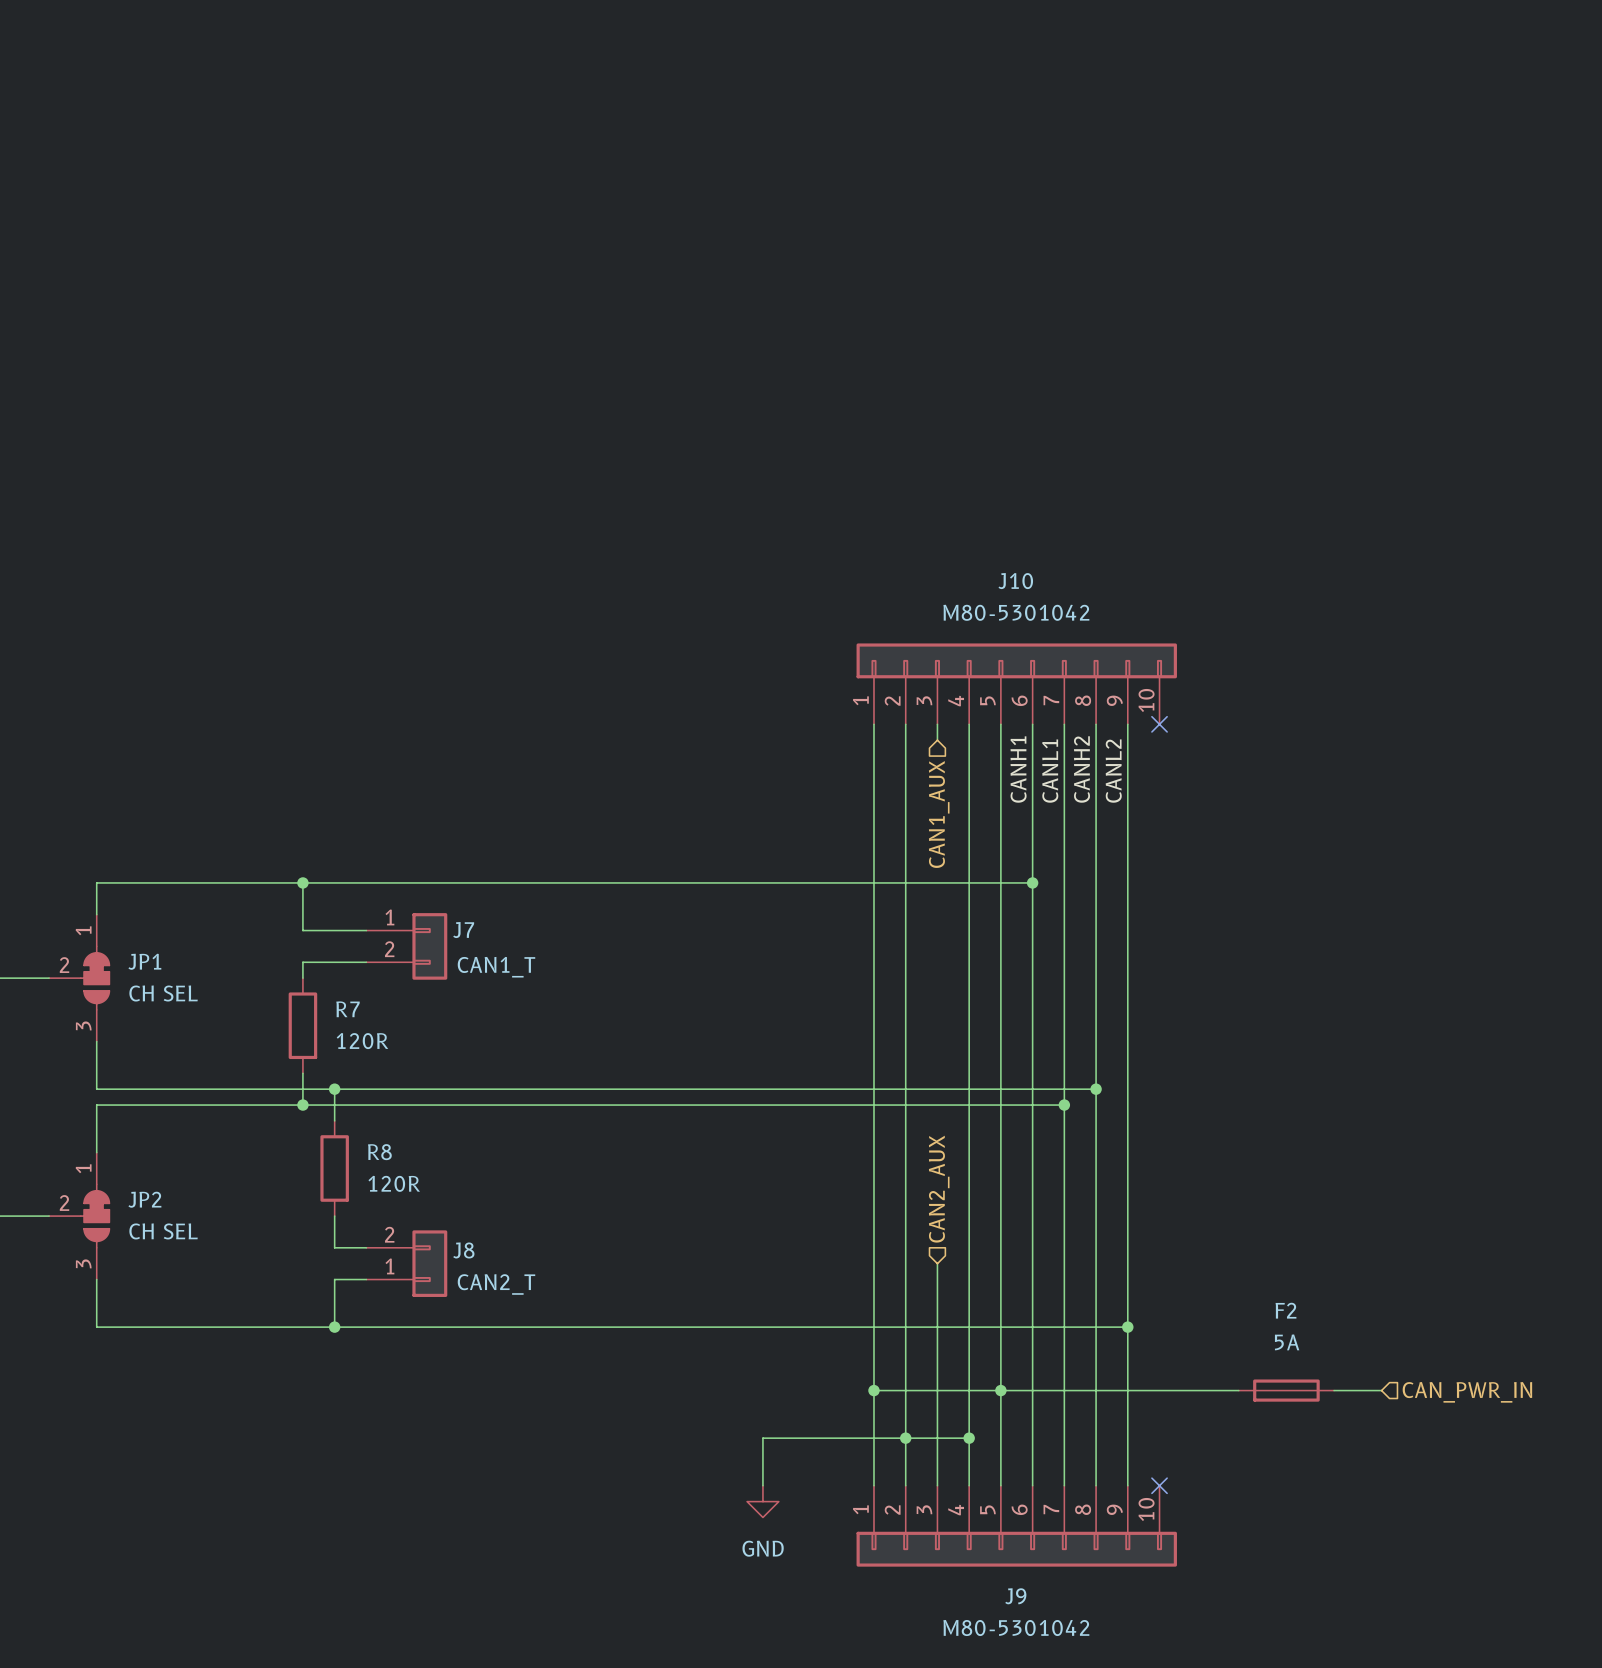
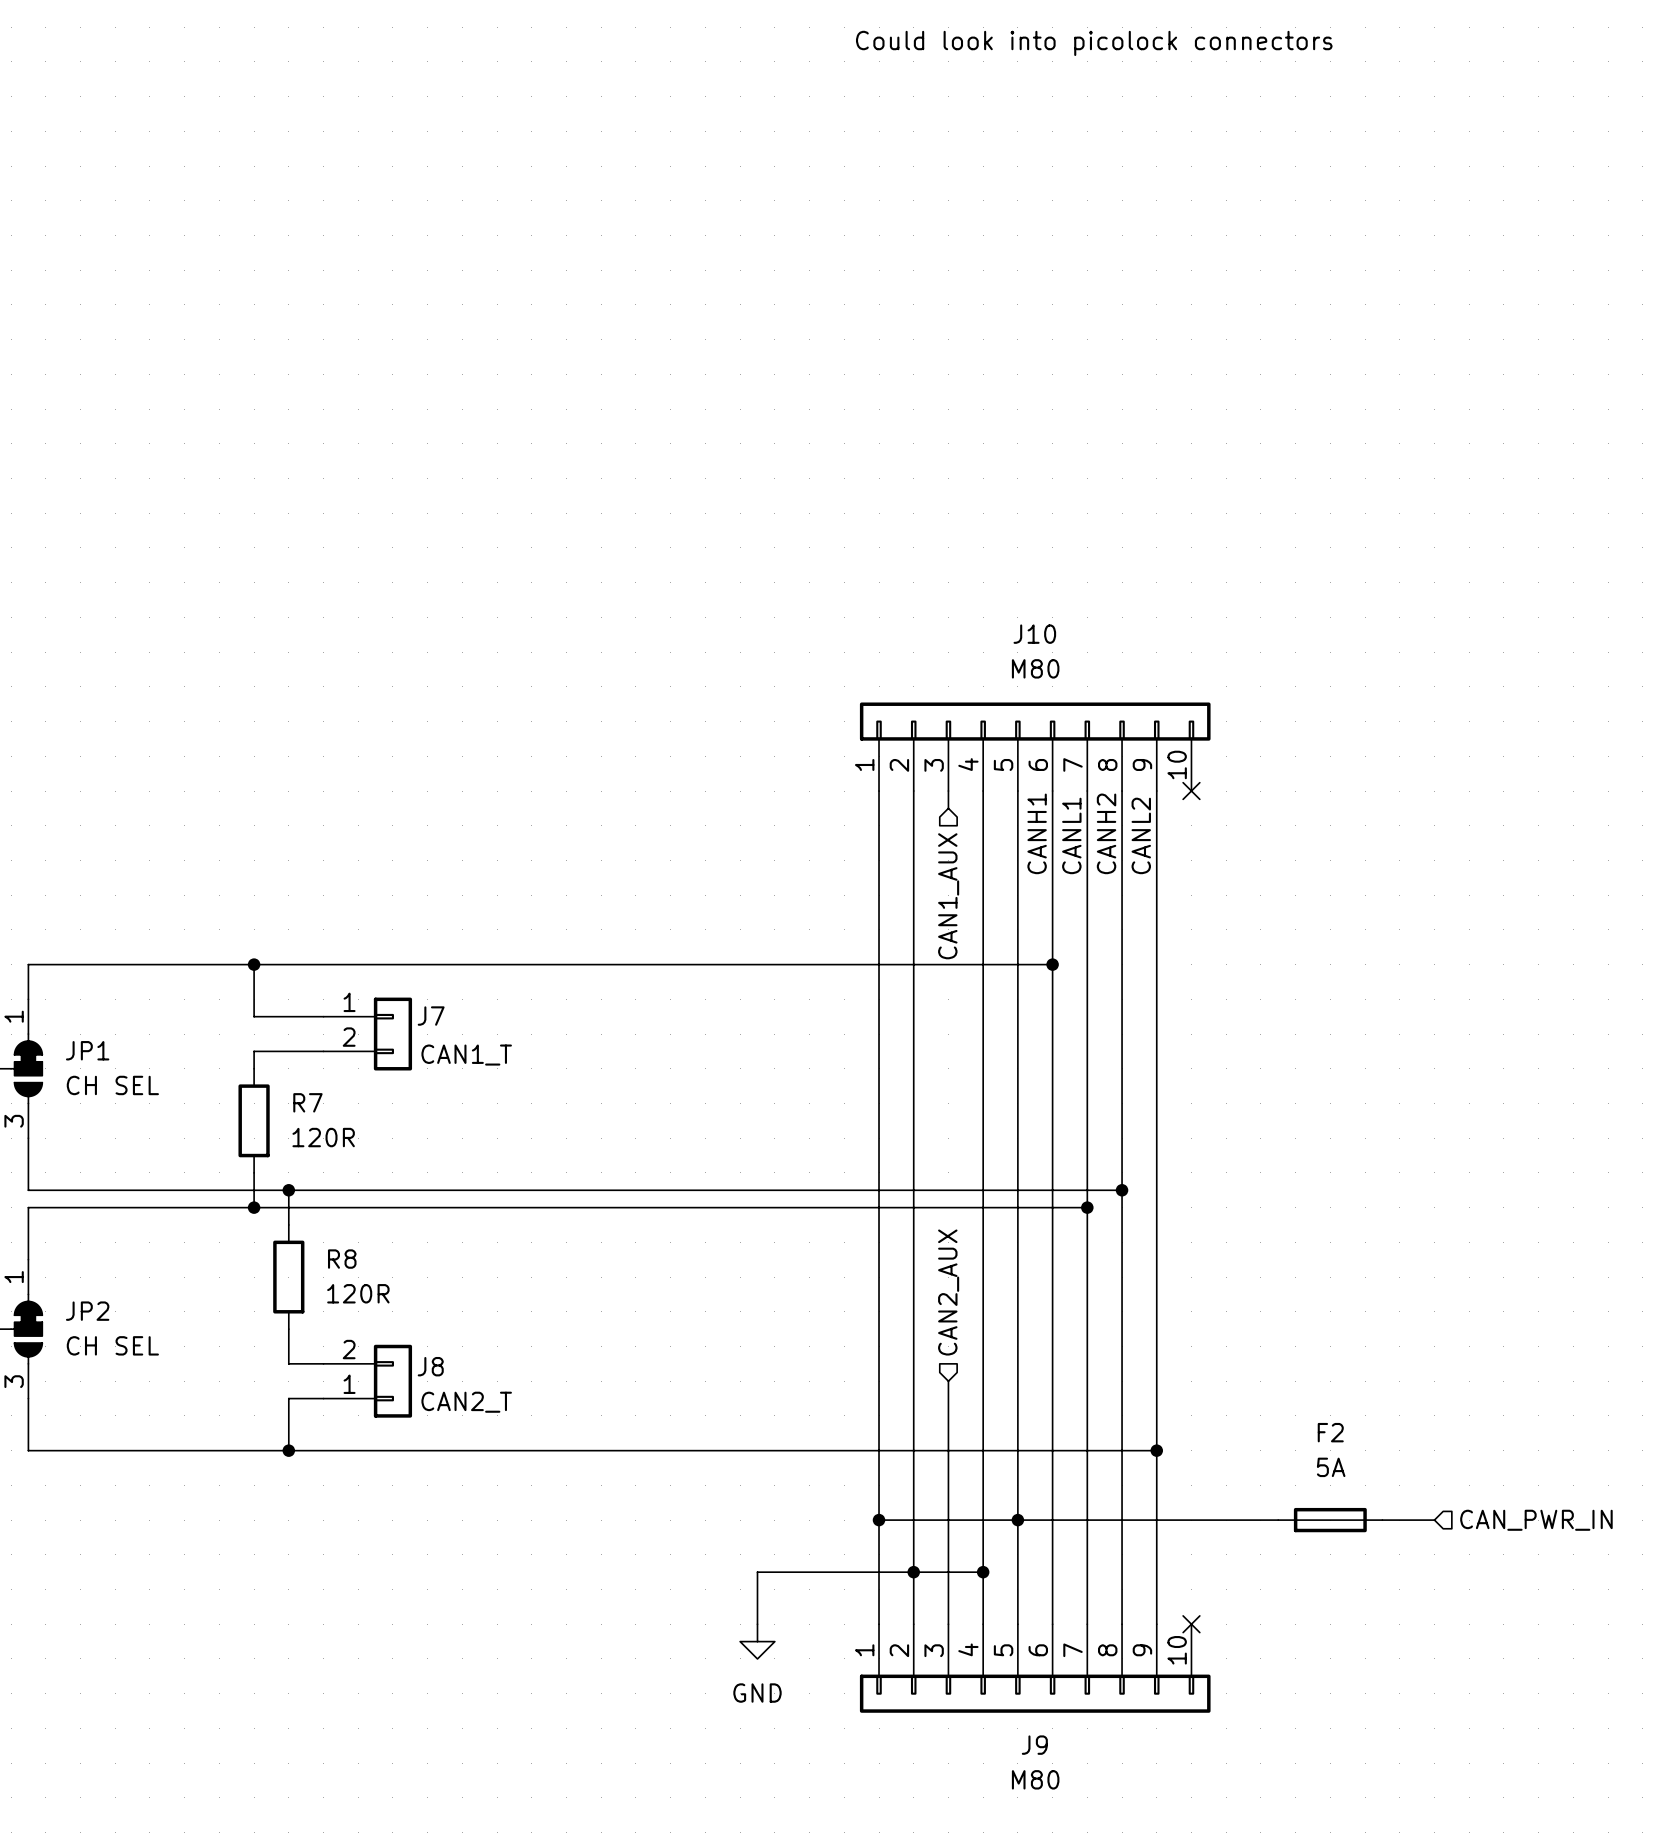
text: none -> Could look into picolock connectors (1094, 43)
J10 value: M80-5301042 (1016, 612) -> M80 (1035, 668)
J9 value: M80-5301042 (1016, 1628) -> M80 (1035, 1779)

